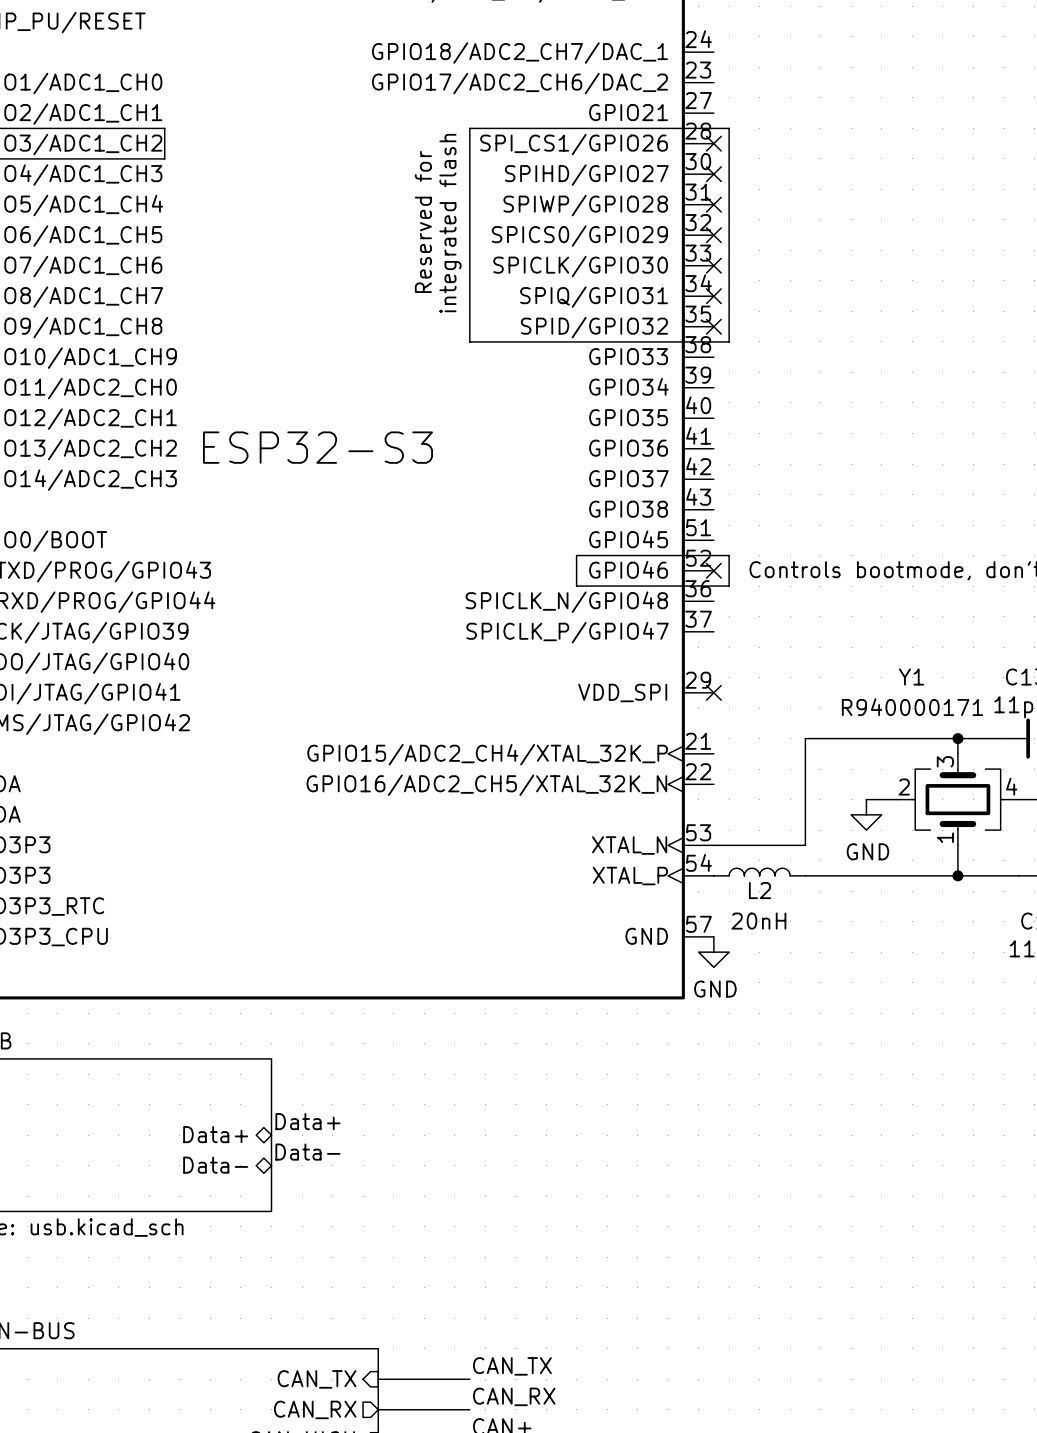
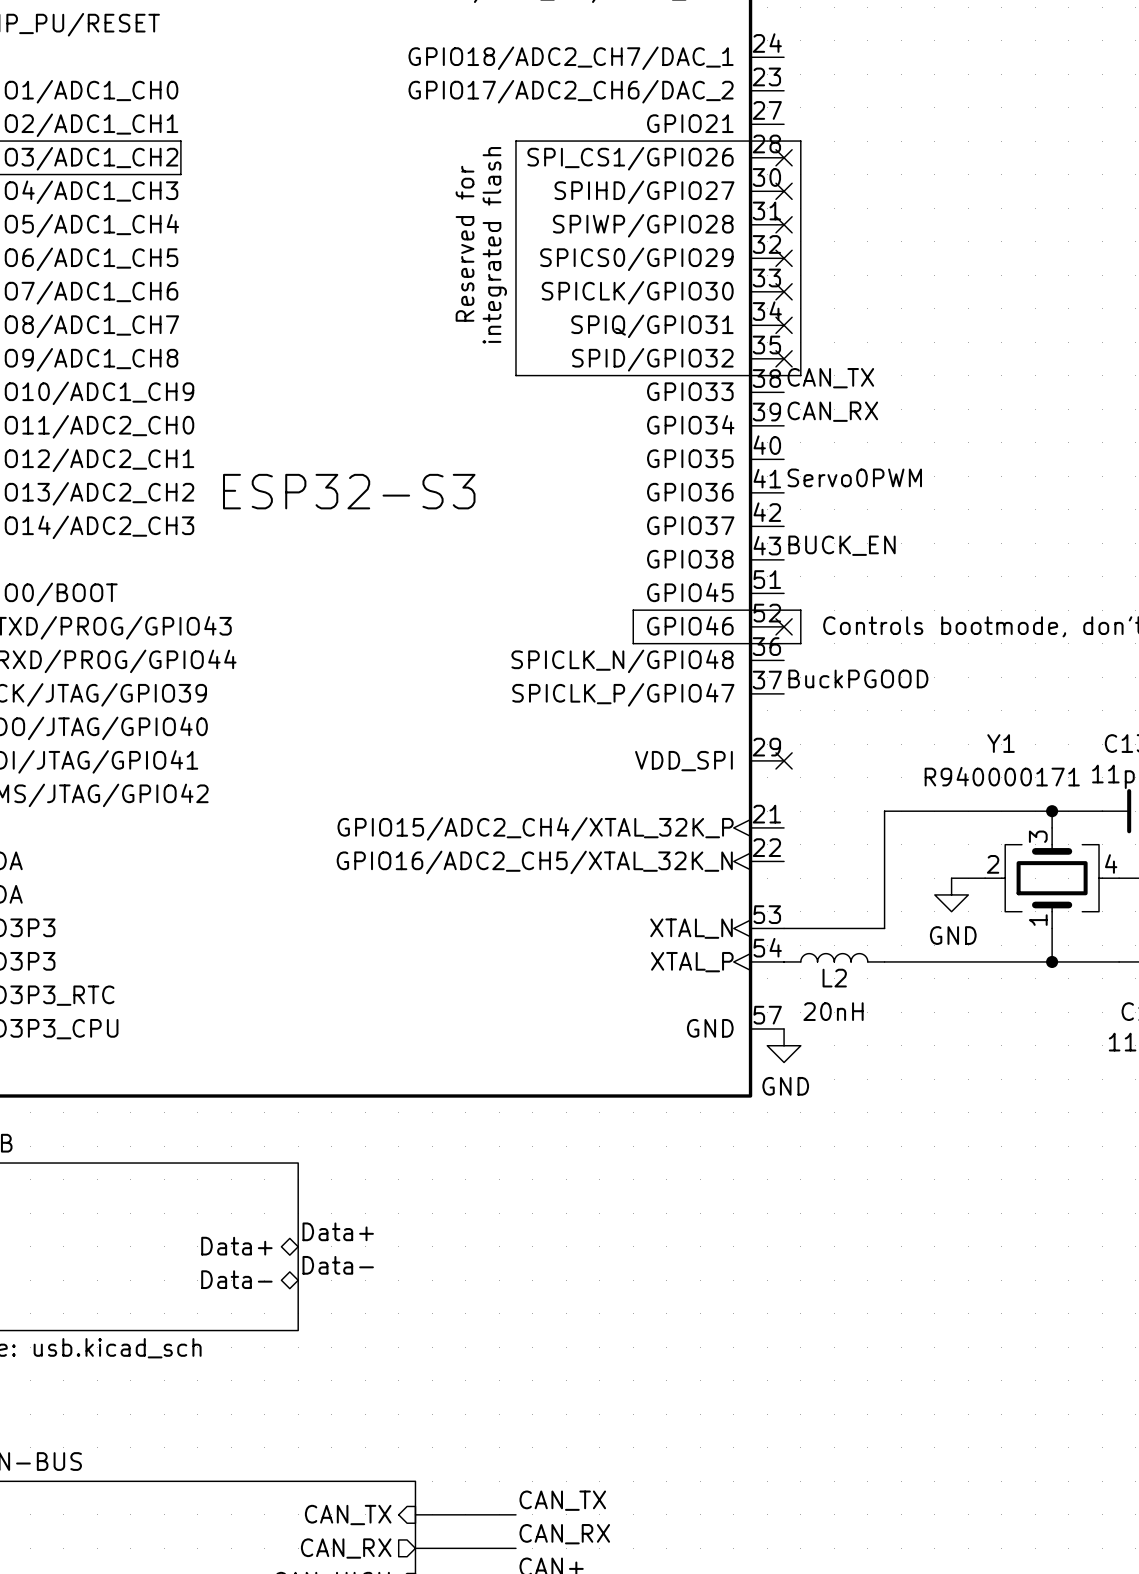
label: none -> CAN_TX (830, 378)
label: none -> CAN_RX (832, 411)
label: none -> Servo0PWM (854, 477)
label: none -> BUCK_EN (842, 545)
label: none -> BuckPGOOD (858, 678)

